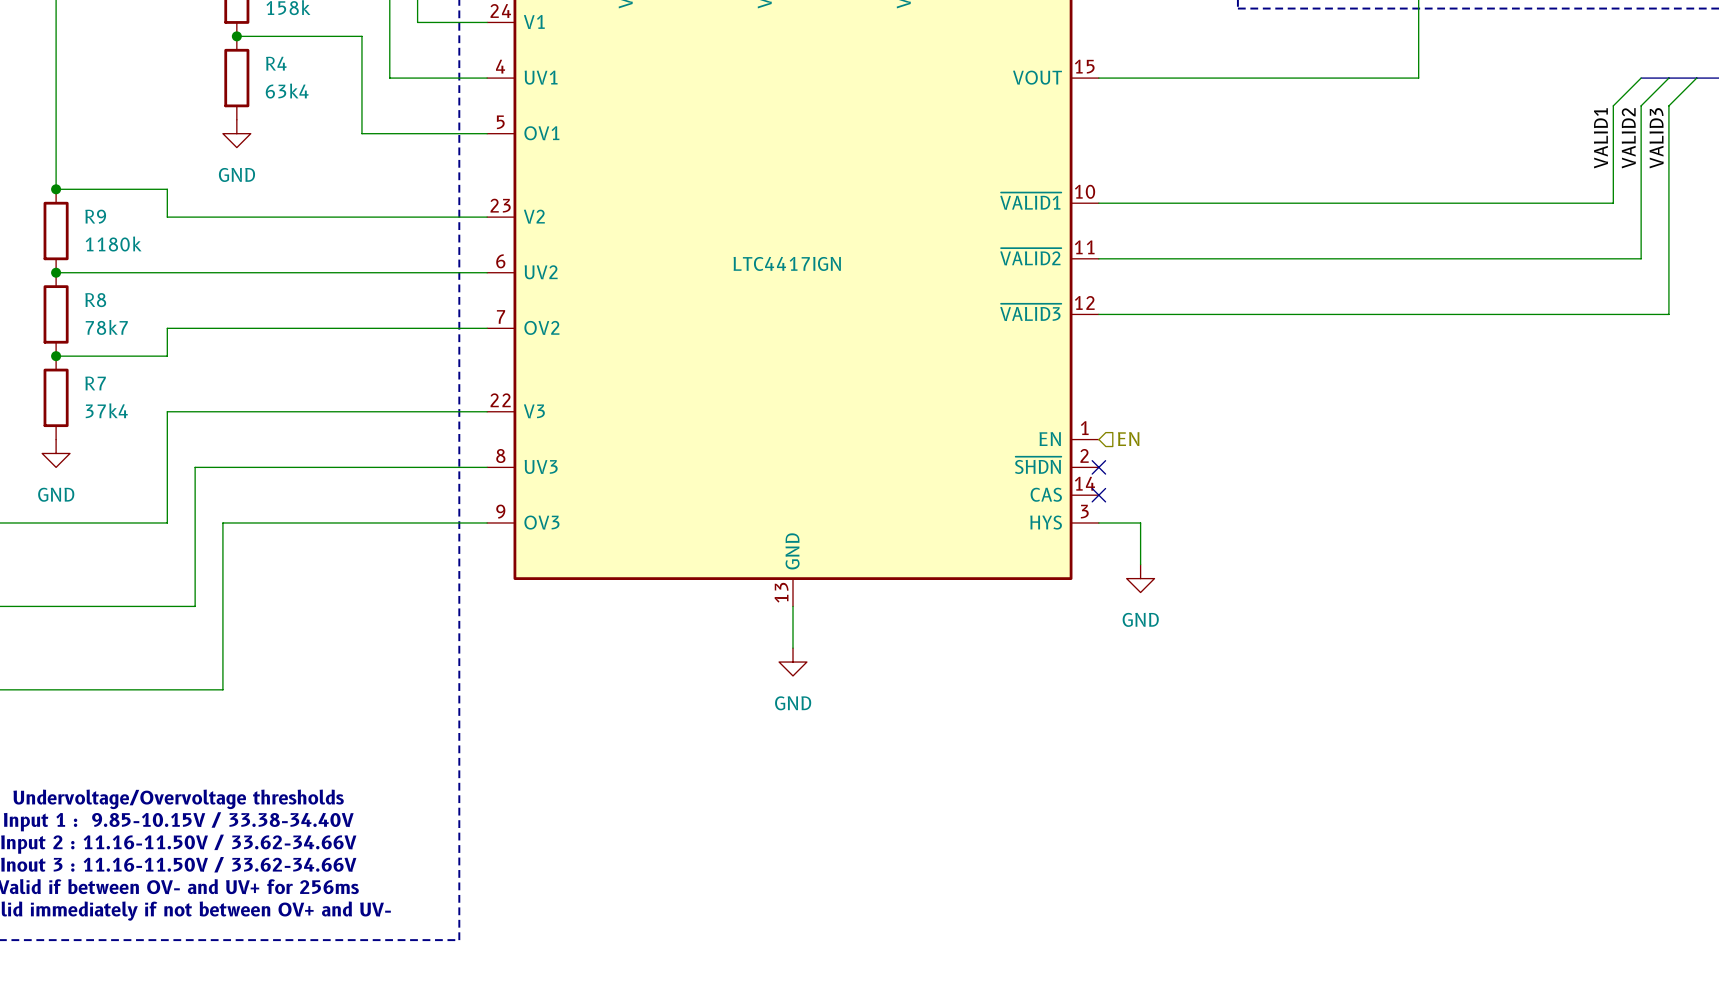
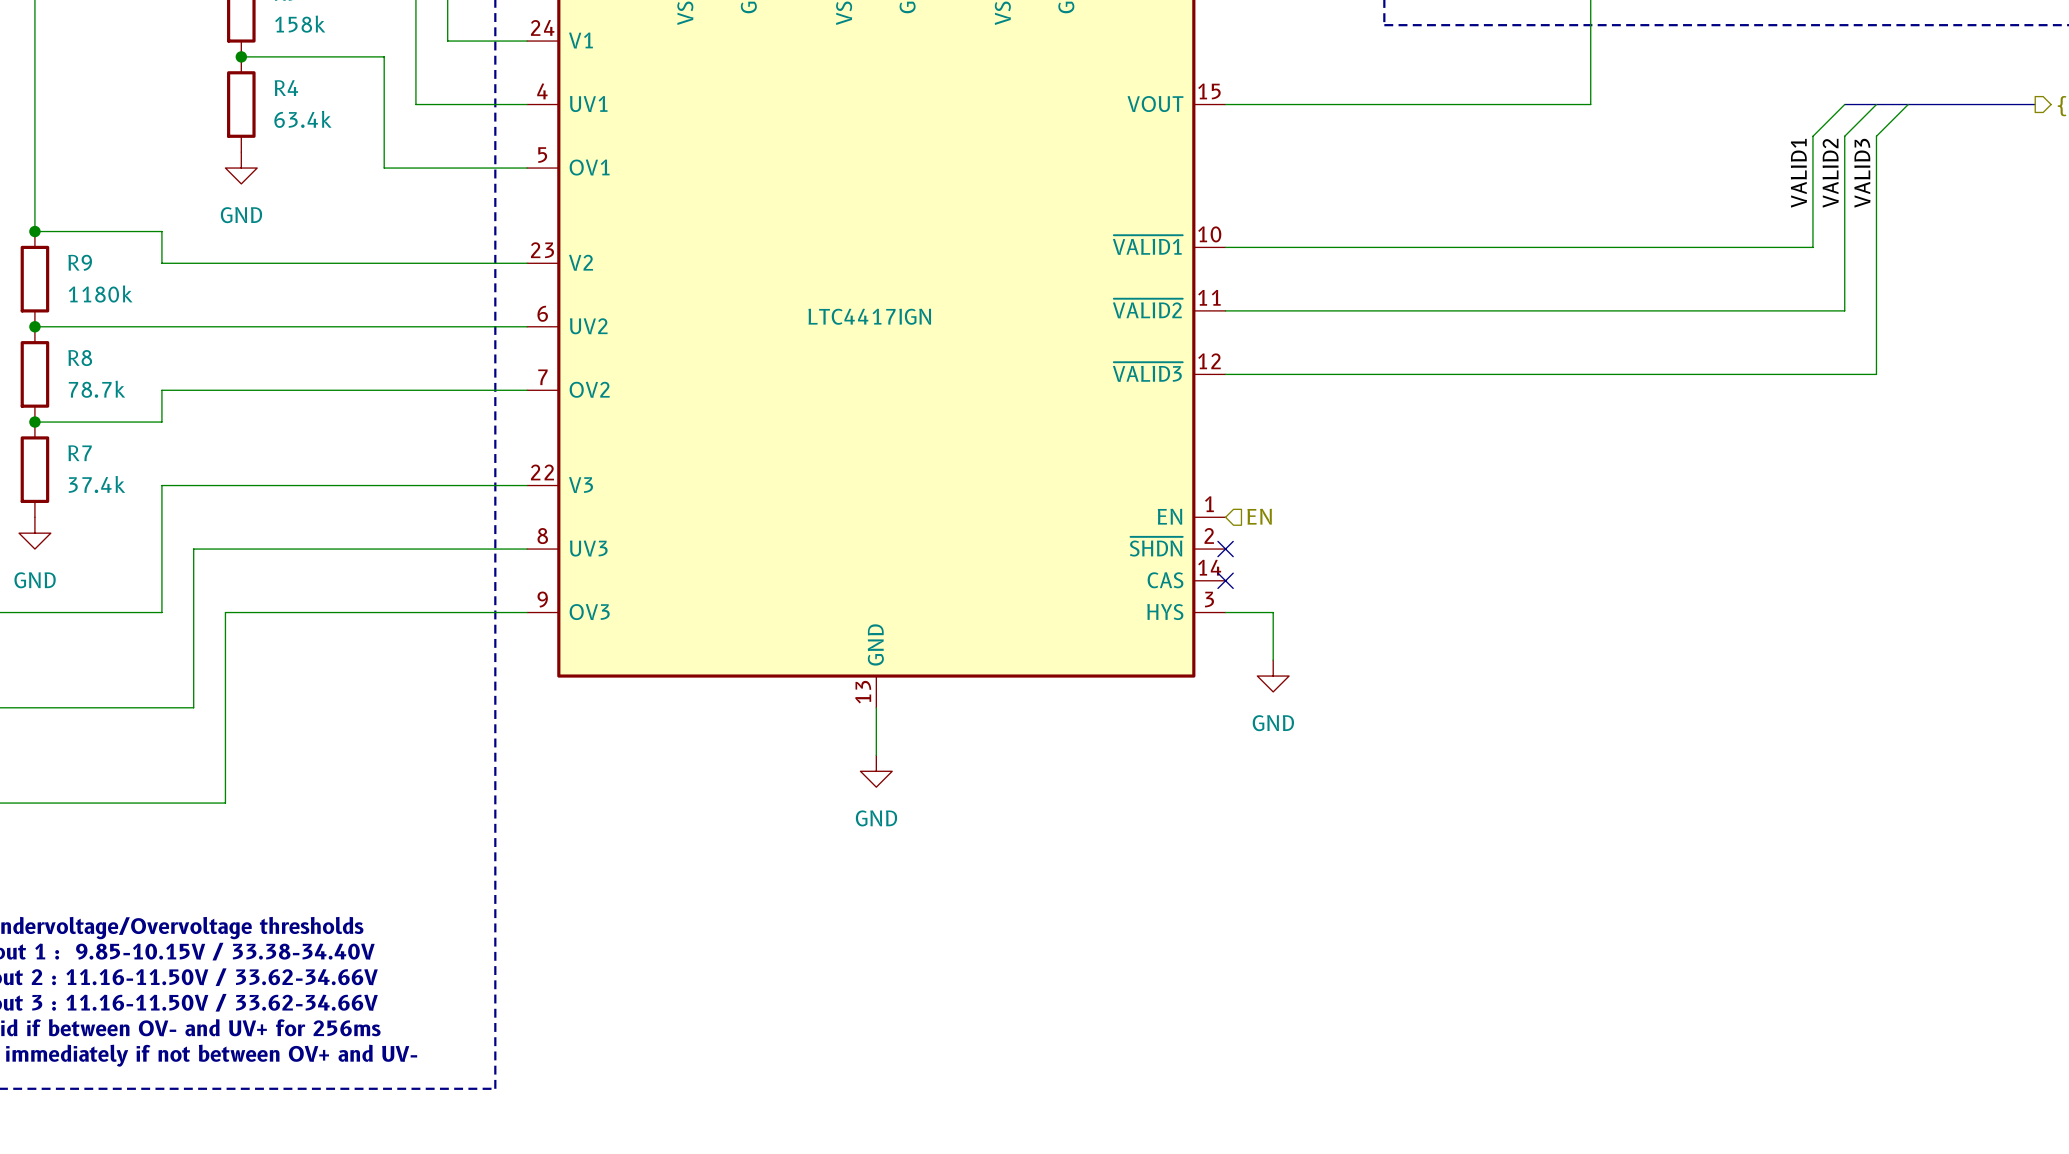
R4 value: 63k4 (287, 91) -> 63.4k (302, 119)
R8 value: 78k7 (106, 327) -> 78.7k (96, 389)
R7 value: 37k4 (106, 410) -> 37.4k (96, 484)

